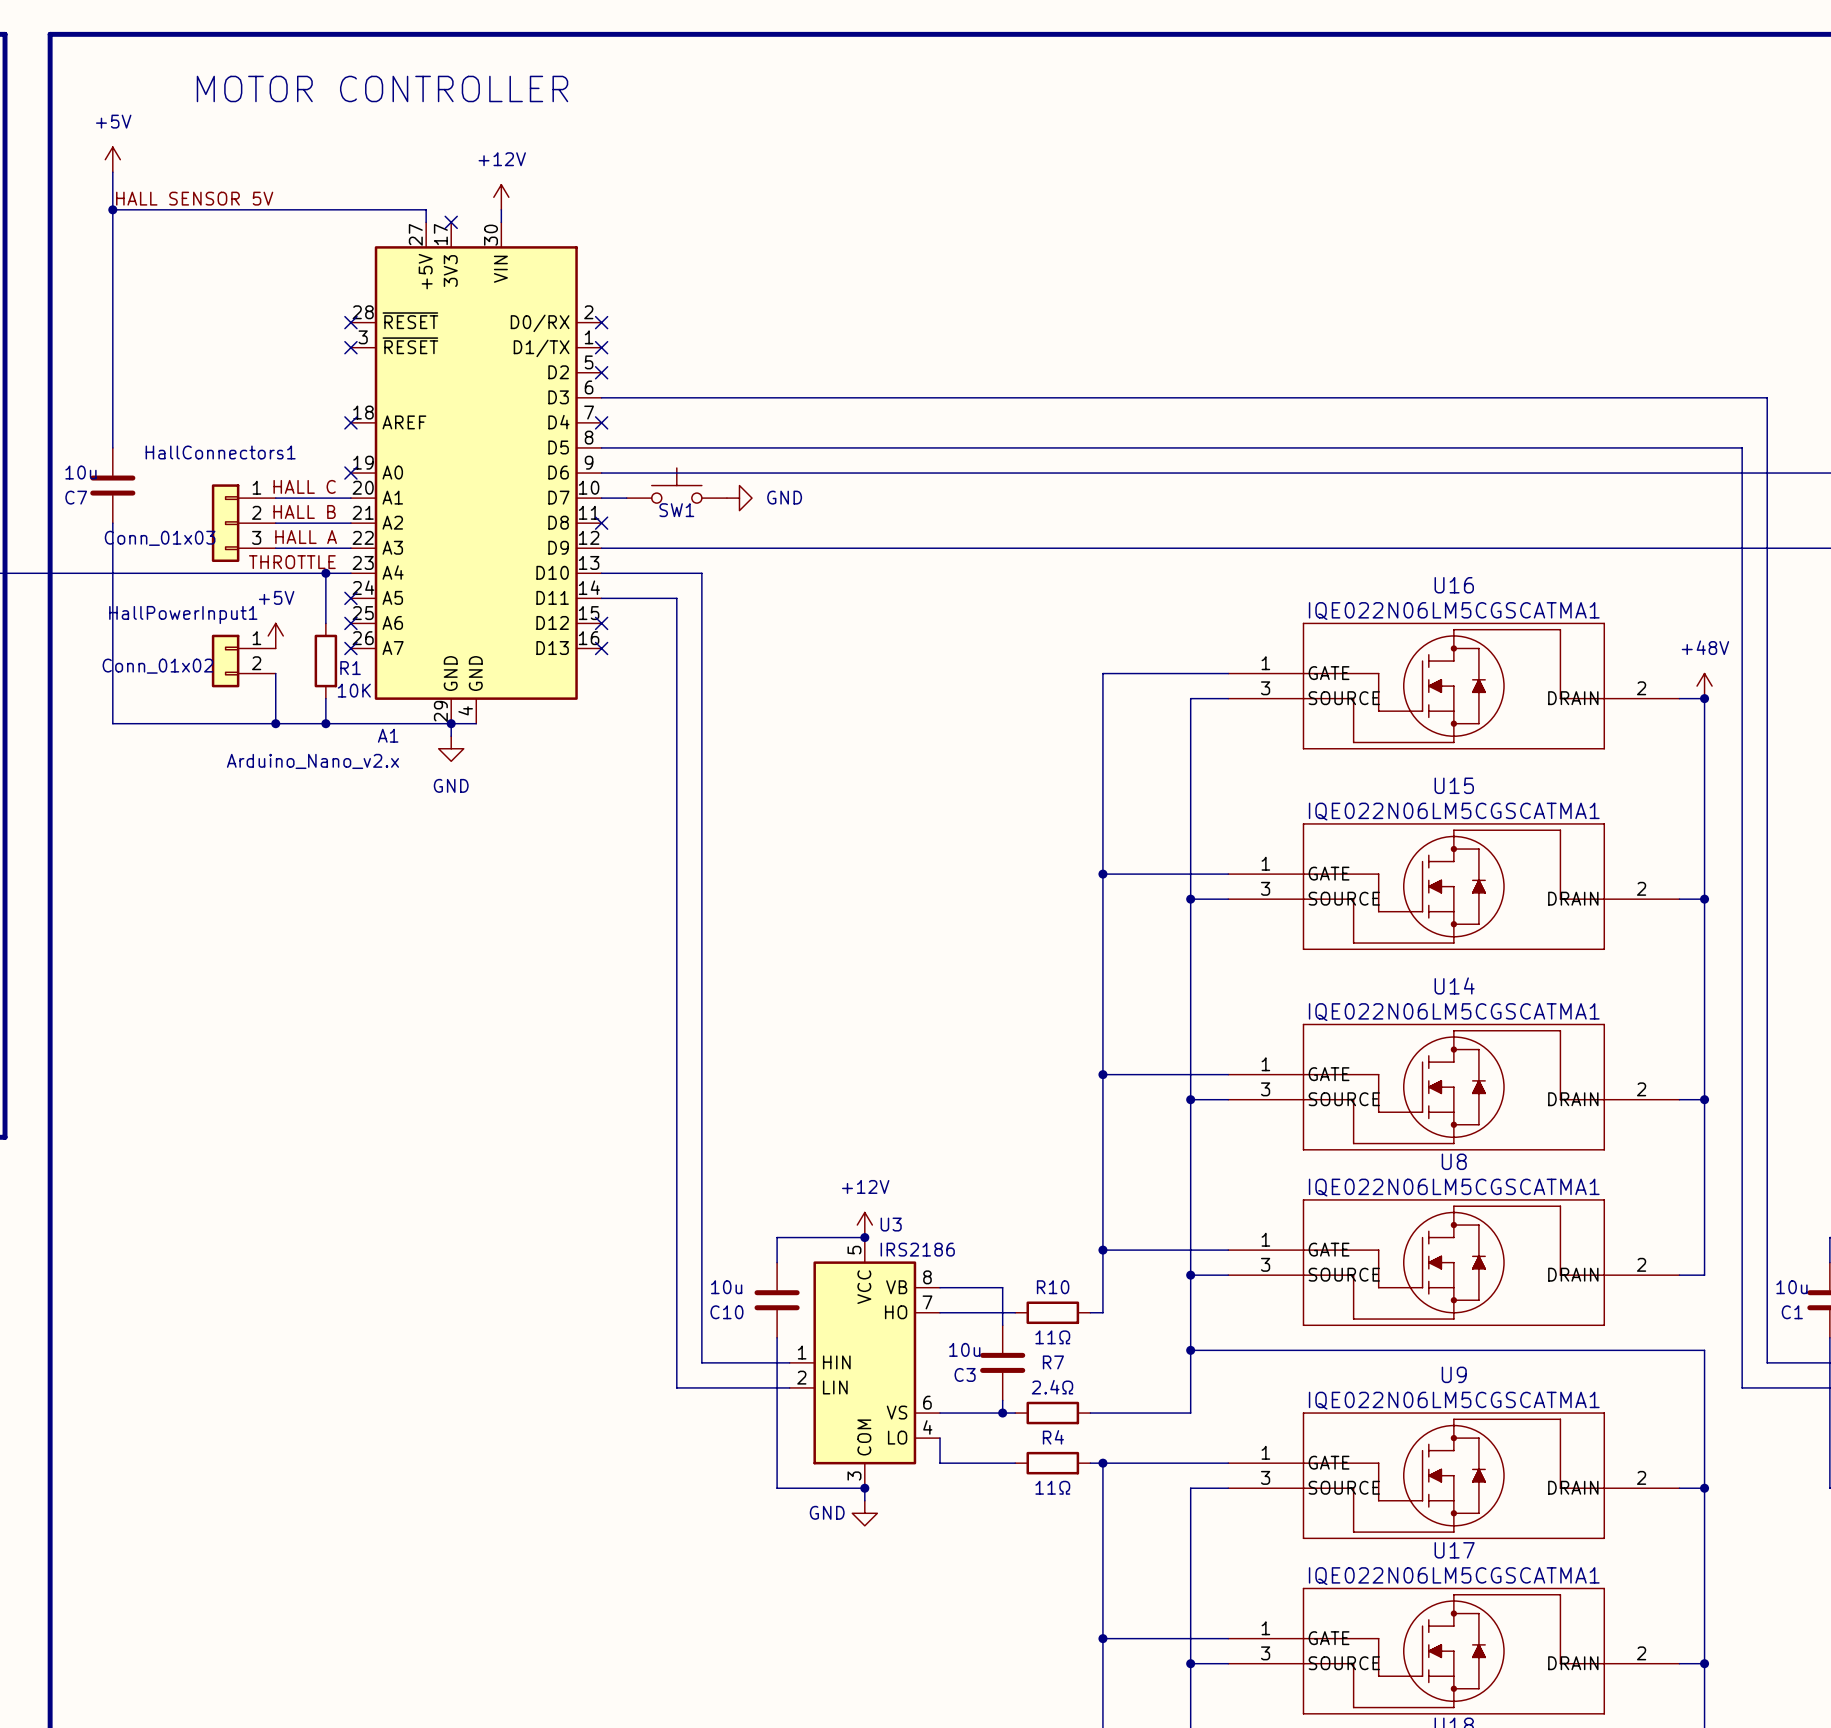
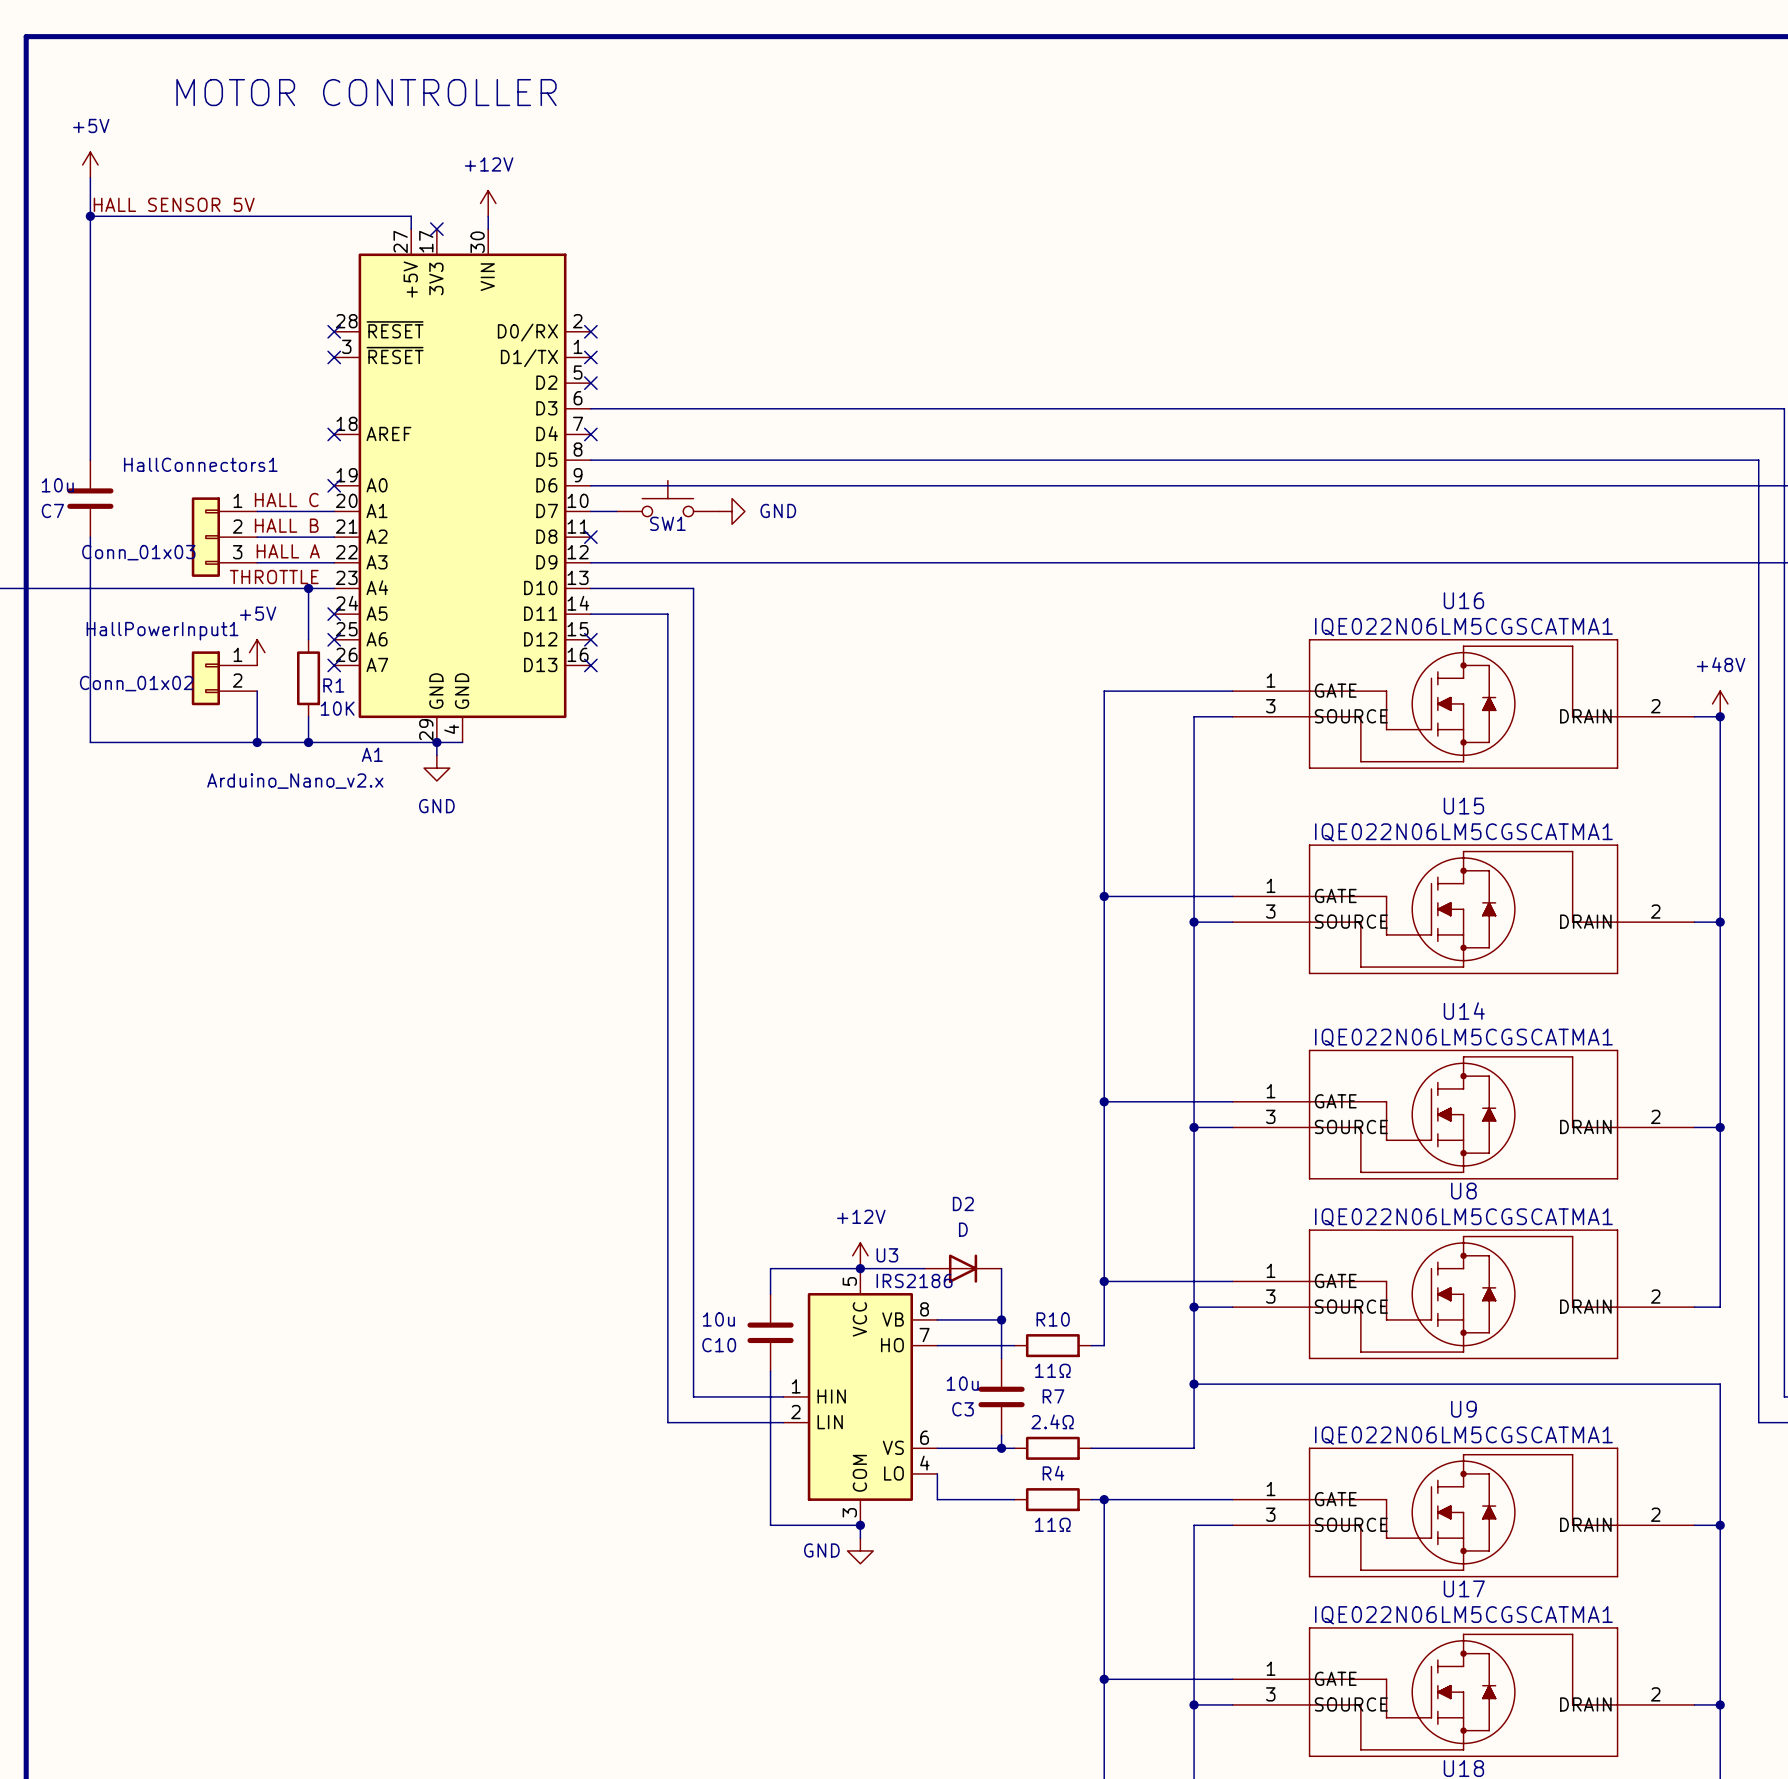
wire: none -> (860, 1268) (924, 1268)
D2: none -> D (963, 1268)
wire: none -> (1001, 1268) (1001, 1319)
junction: none -> (1001, 1319)

